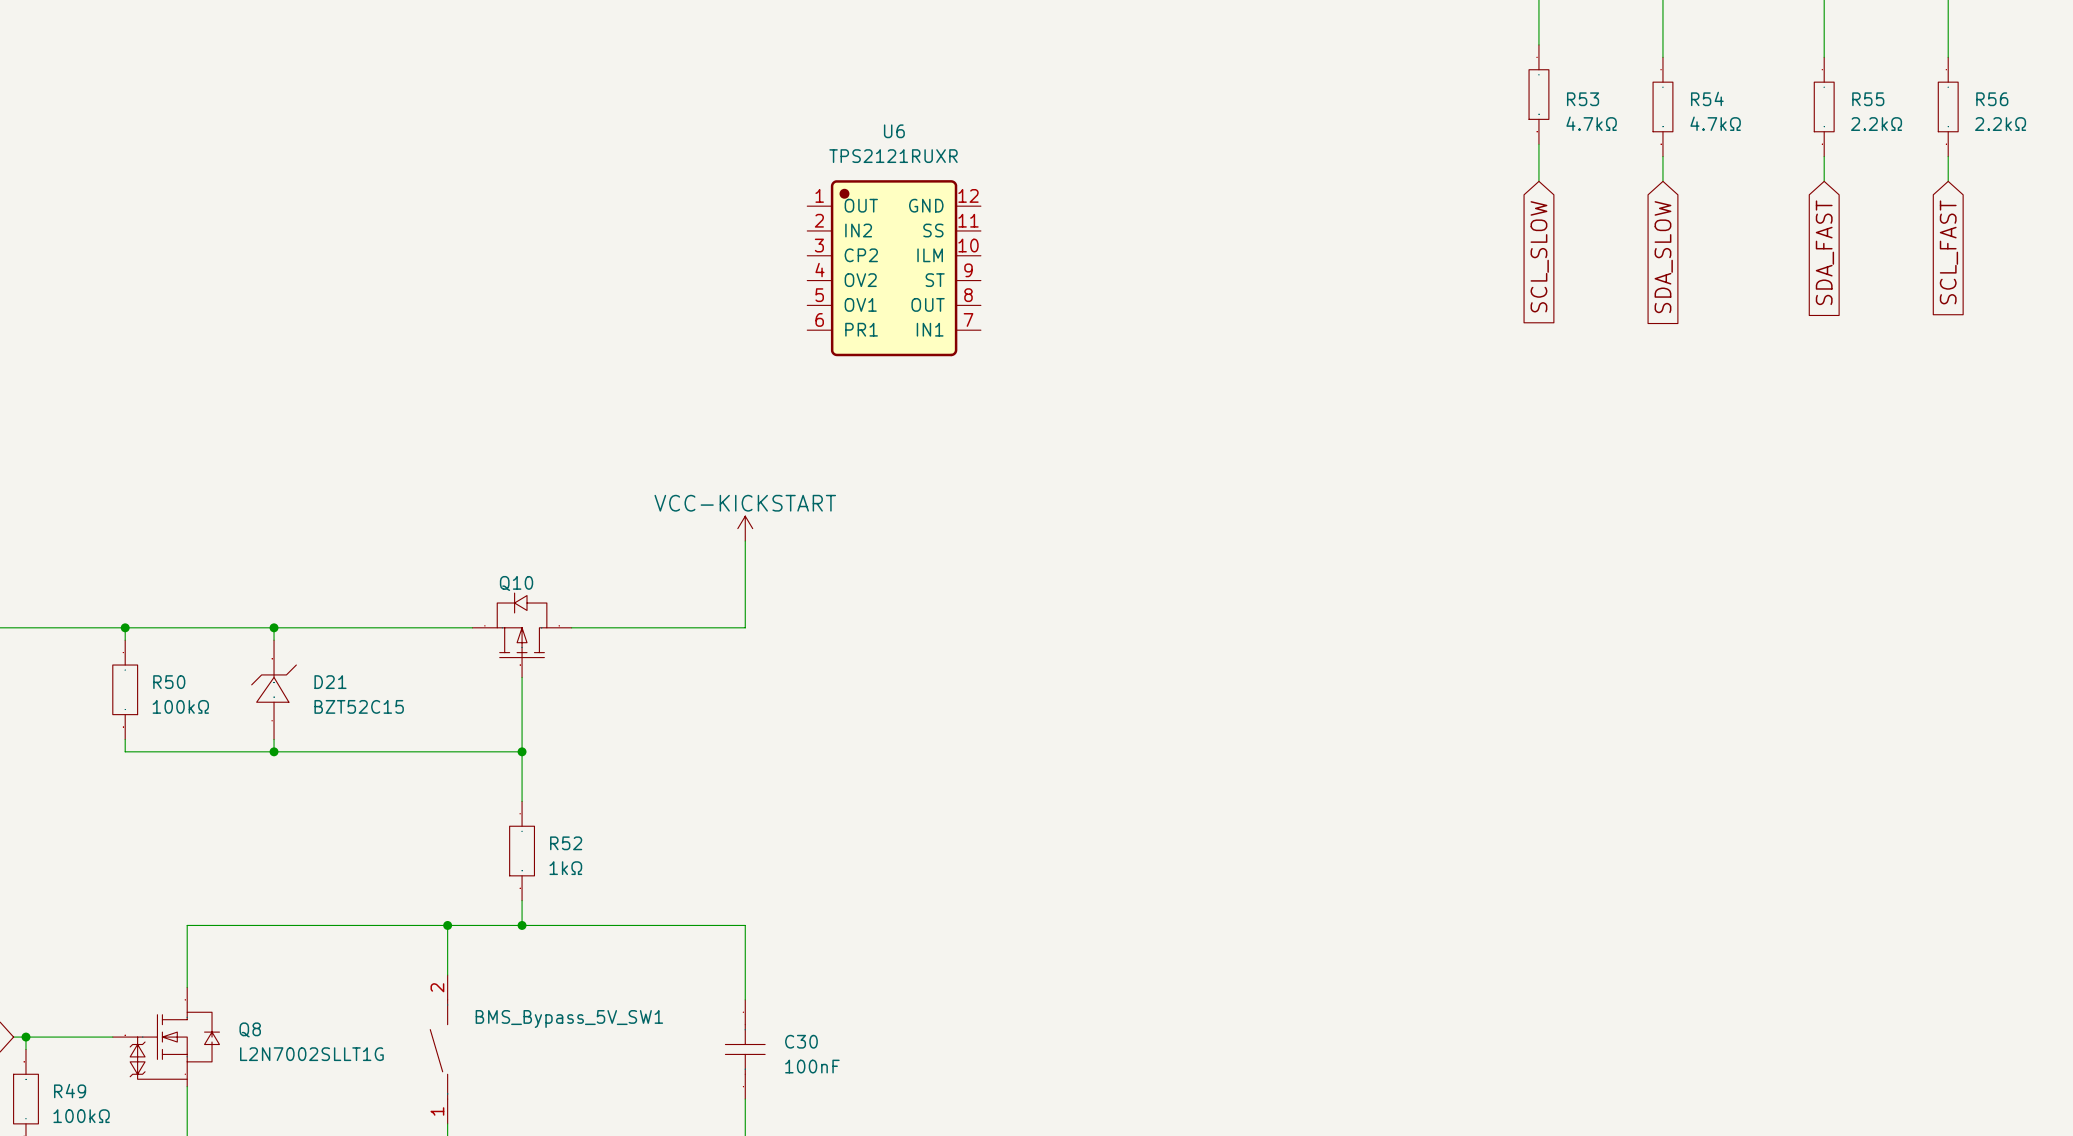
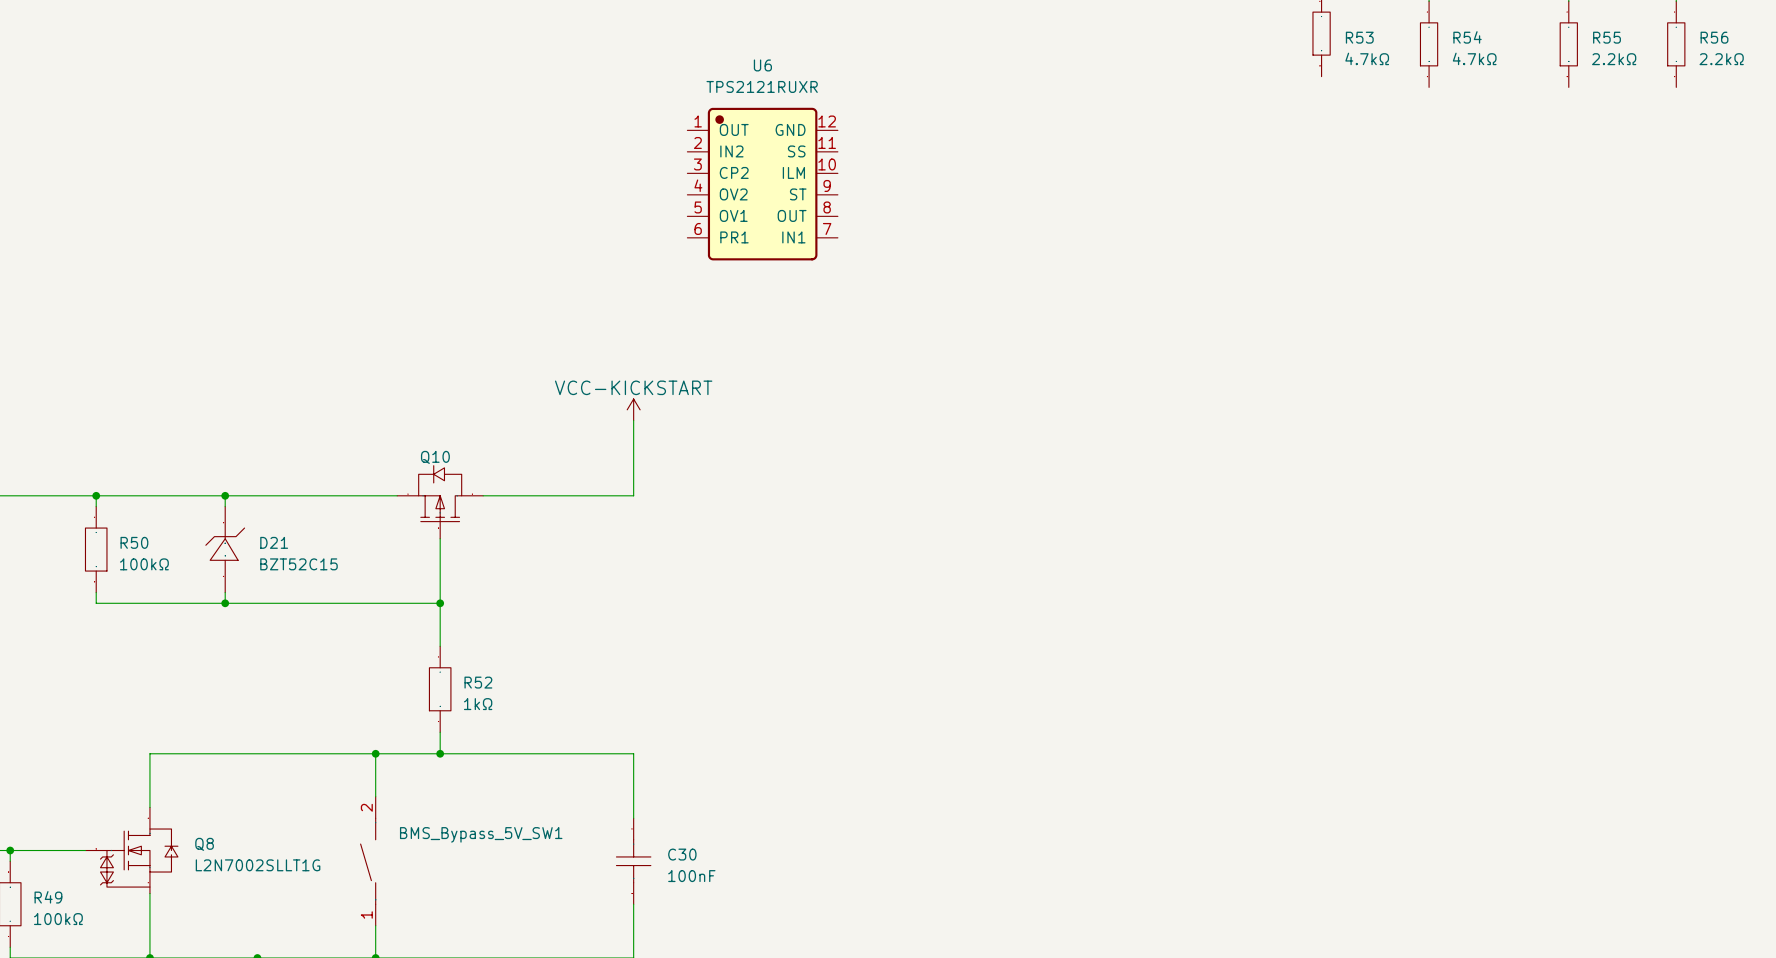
wire: (1538, 144) (1538, 181) -> none
wire: (1662, 156) (1662, 181) -> none
wire: (1824, 156) (1824, 181) -> none
wire: (1948, 156) (1948, 181) -> none
global label: SDA_FAST (1824, 252) -> none
global label: SCL_FAST (1948, 252) -> none
global label: SCL_SLOW (1539, 256) -> none
global label: SDA_SLOW (1663, 257) -> none

